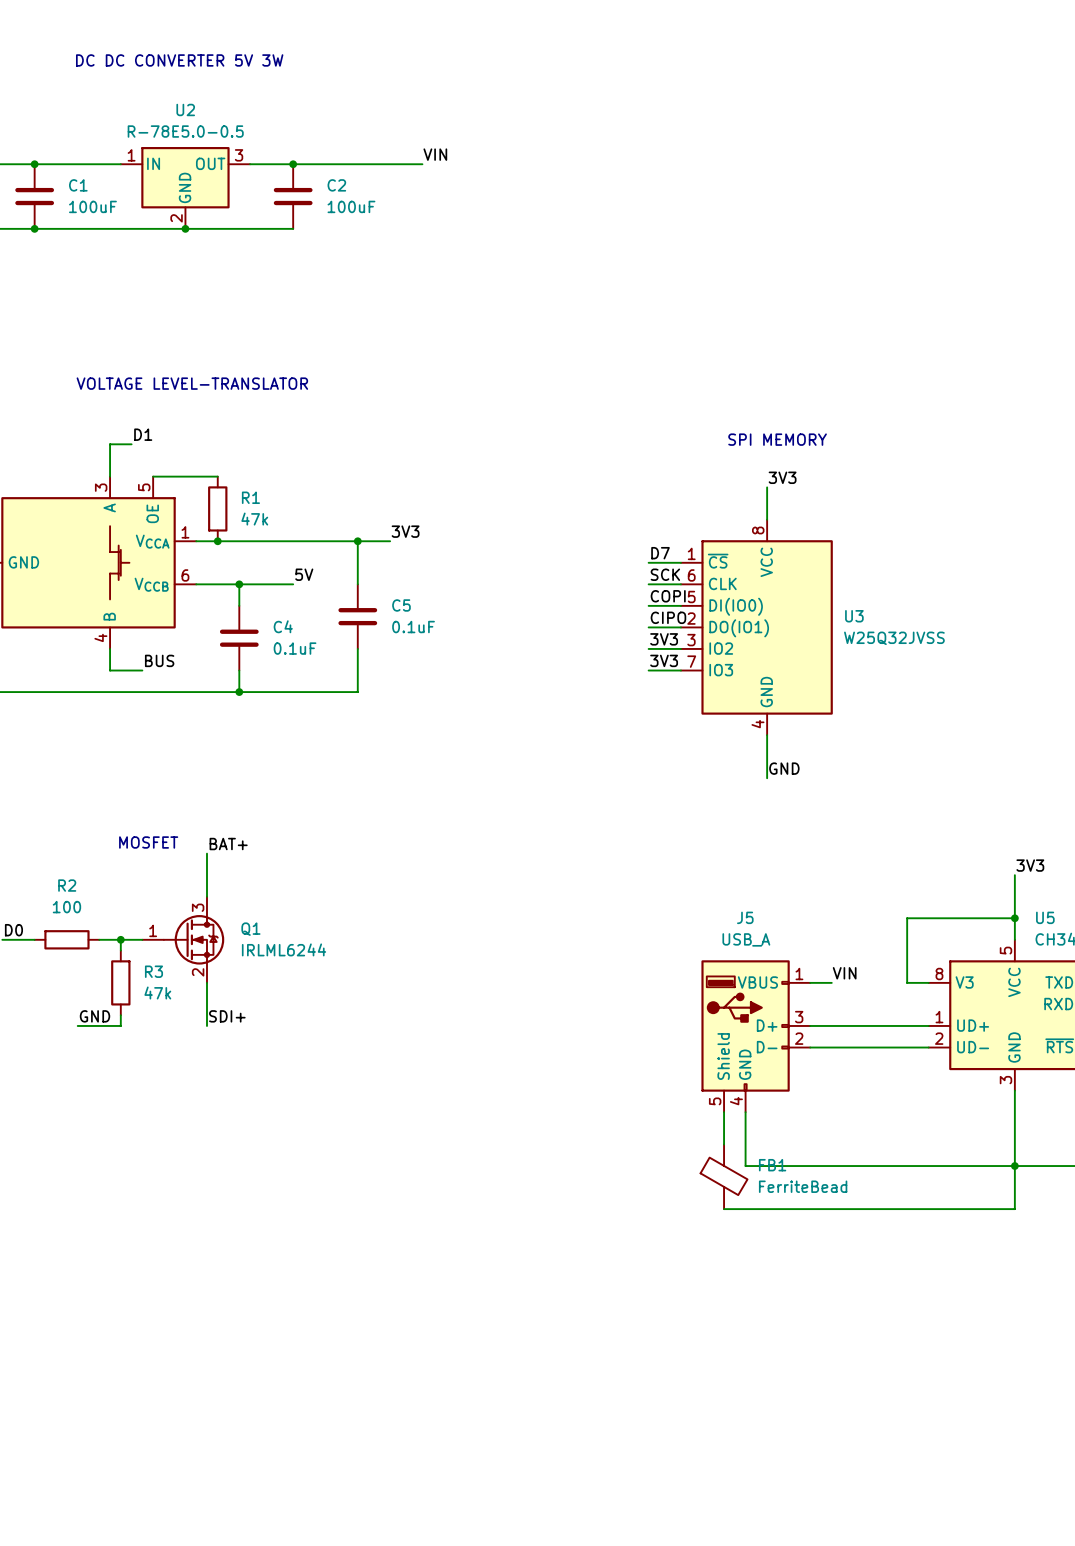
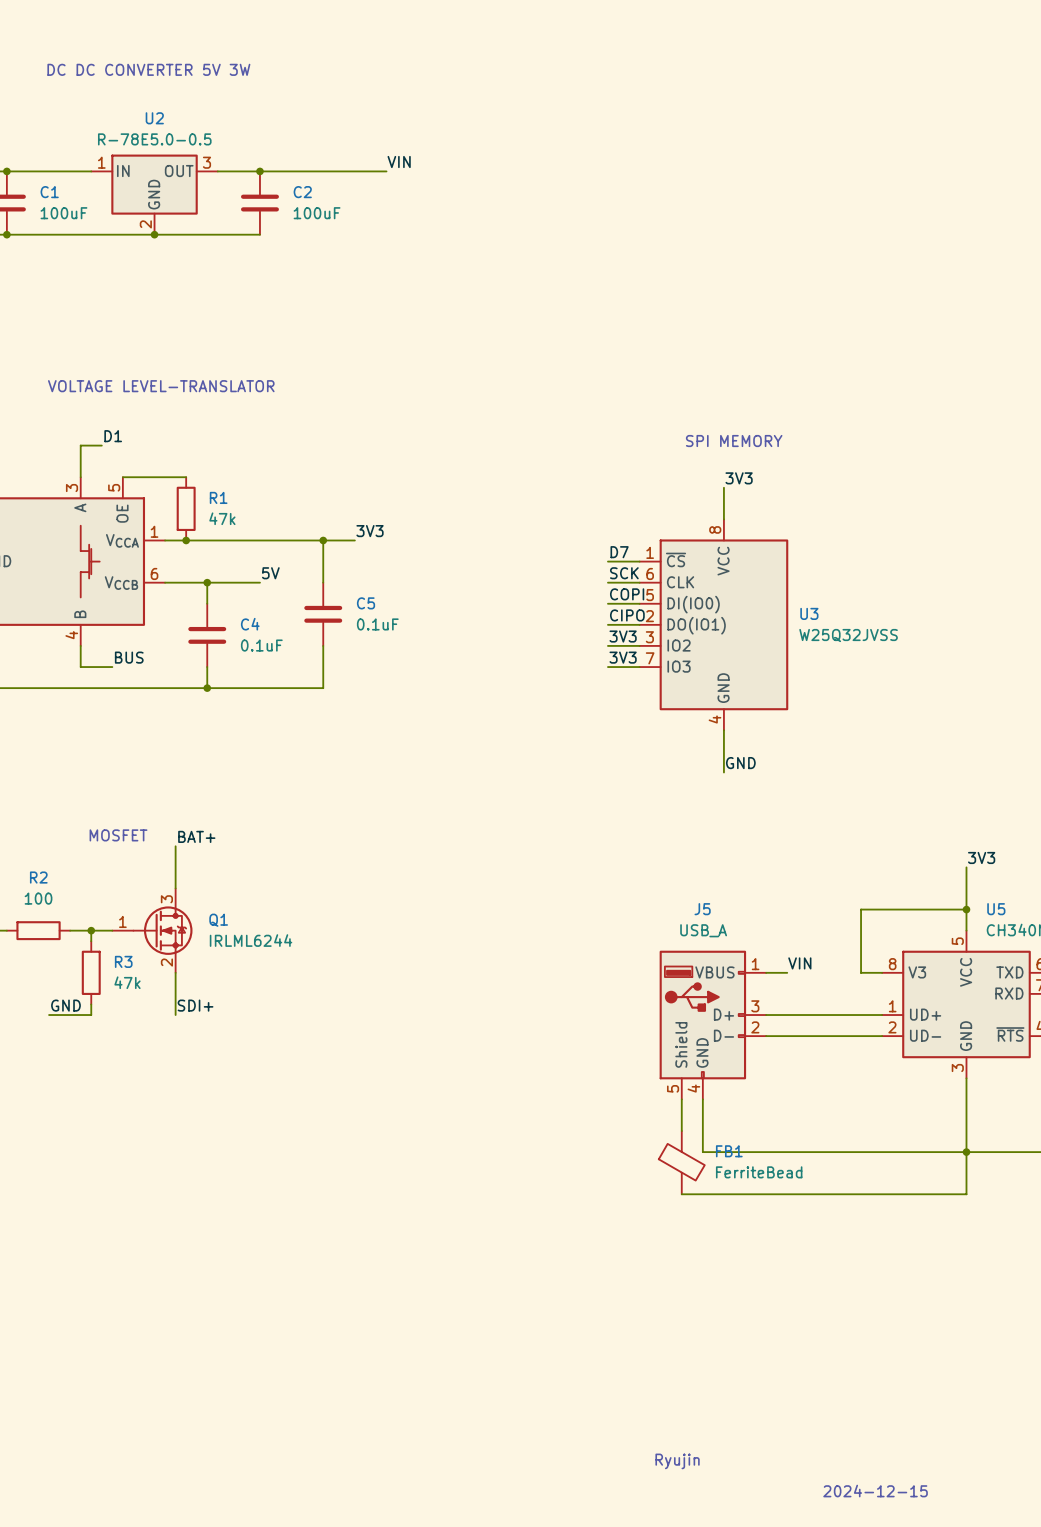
text: none -> Ryujin (677, 1461)
text: none -> 2024-12-15 (875, 1491)

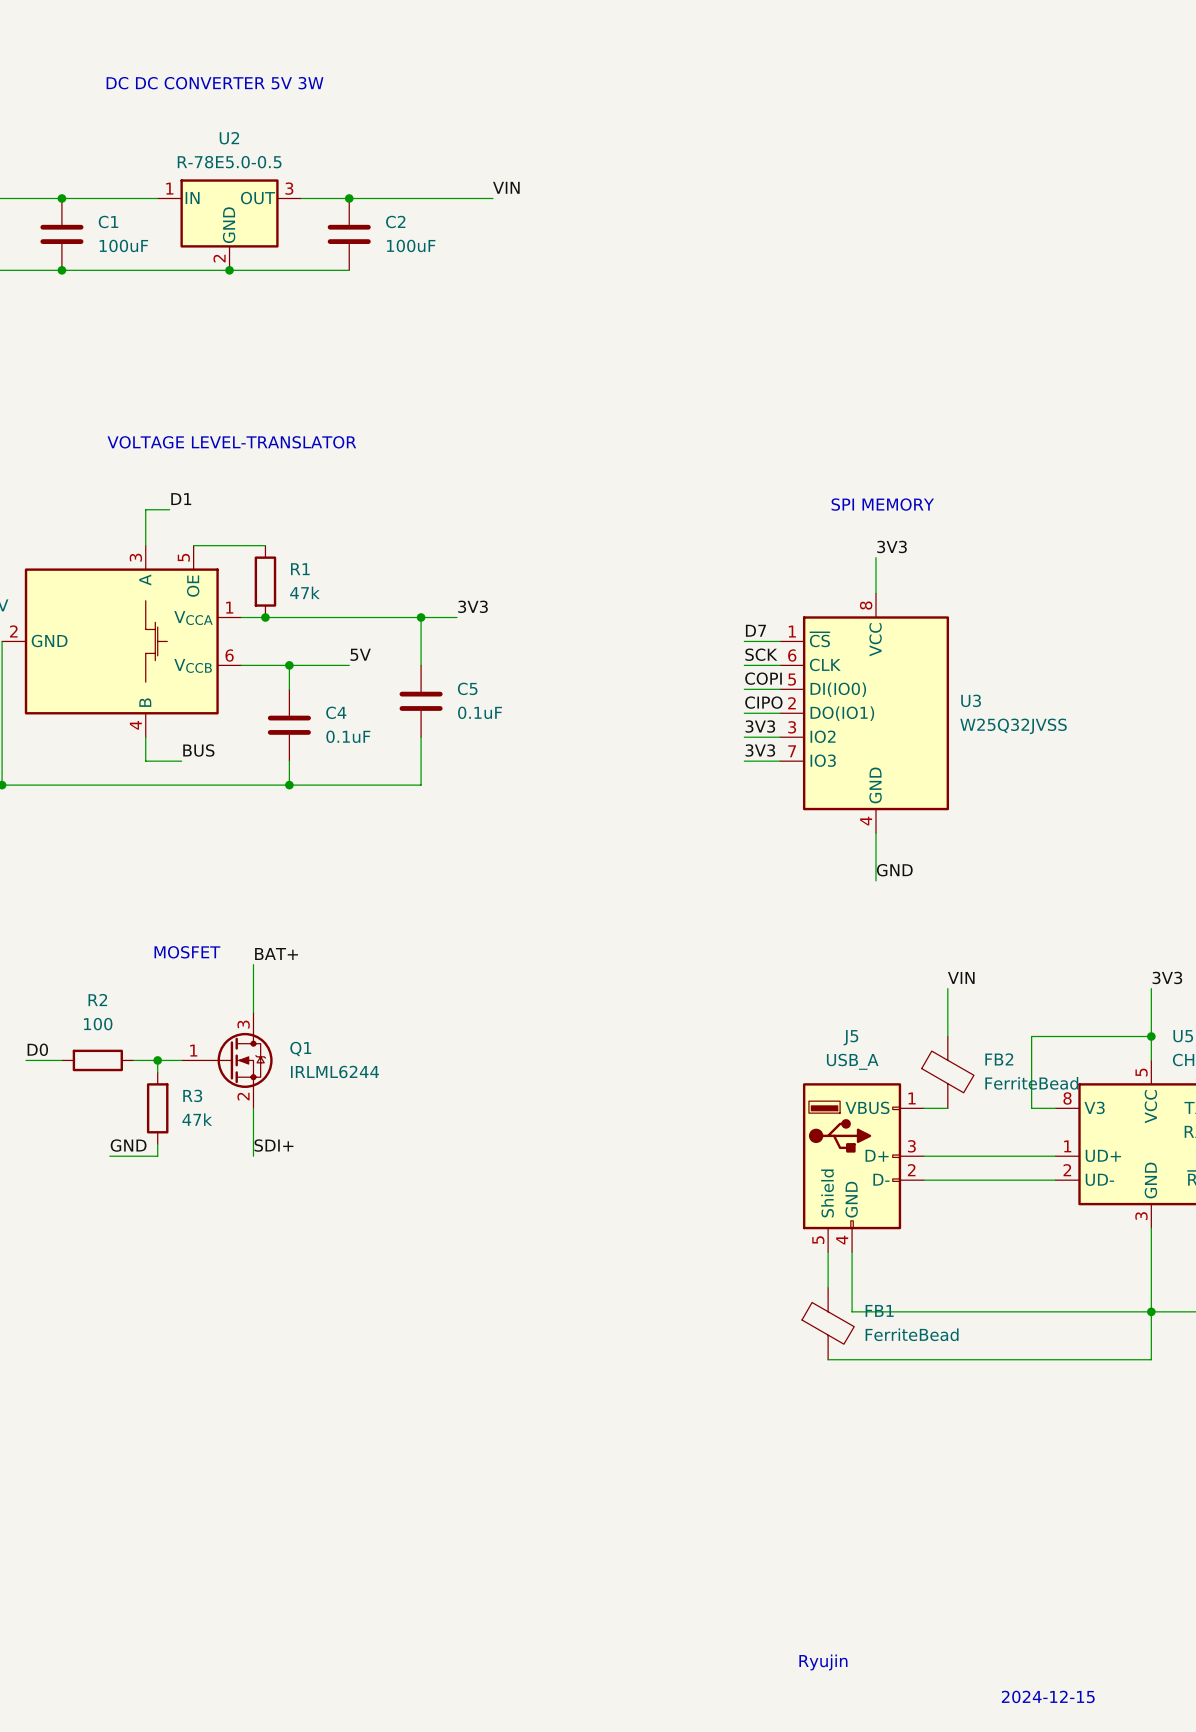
wire: none -> (947, 988) (947, 1036)
FB2: none -> FerriteBead (947, 1072)
label position: VIN (799, 963) -> VIN (961, 977)

